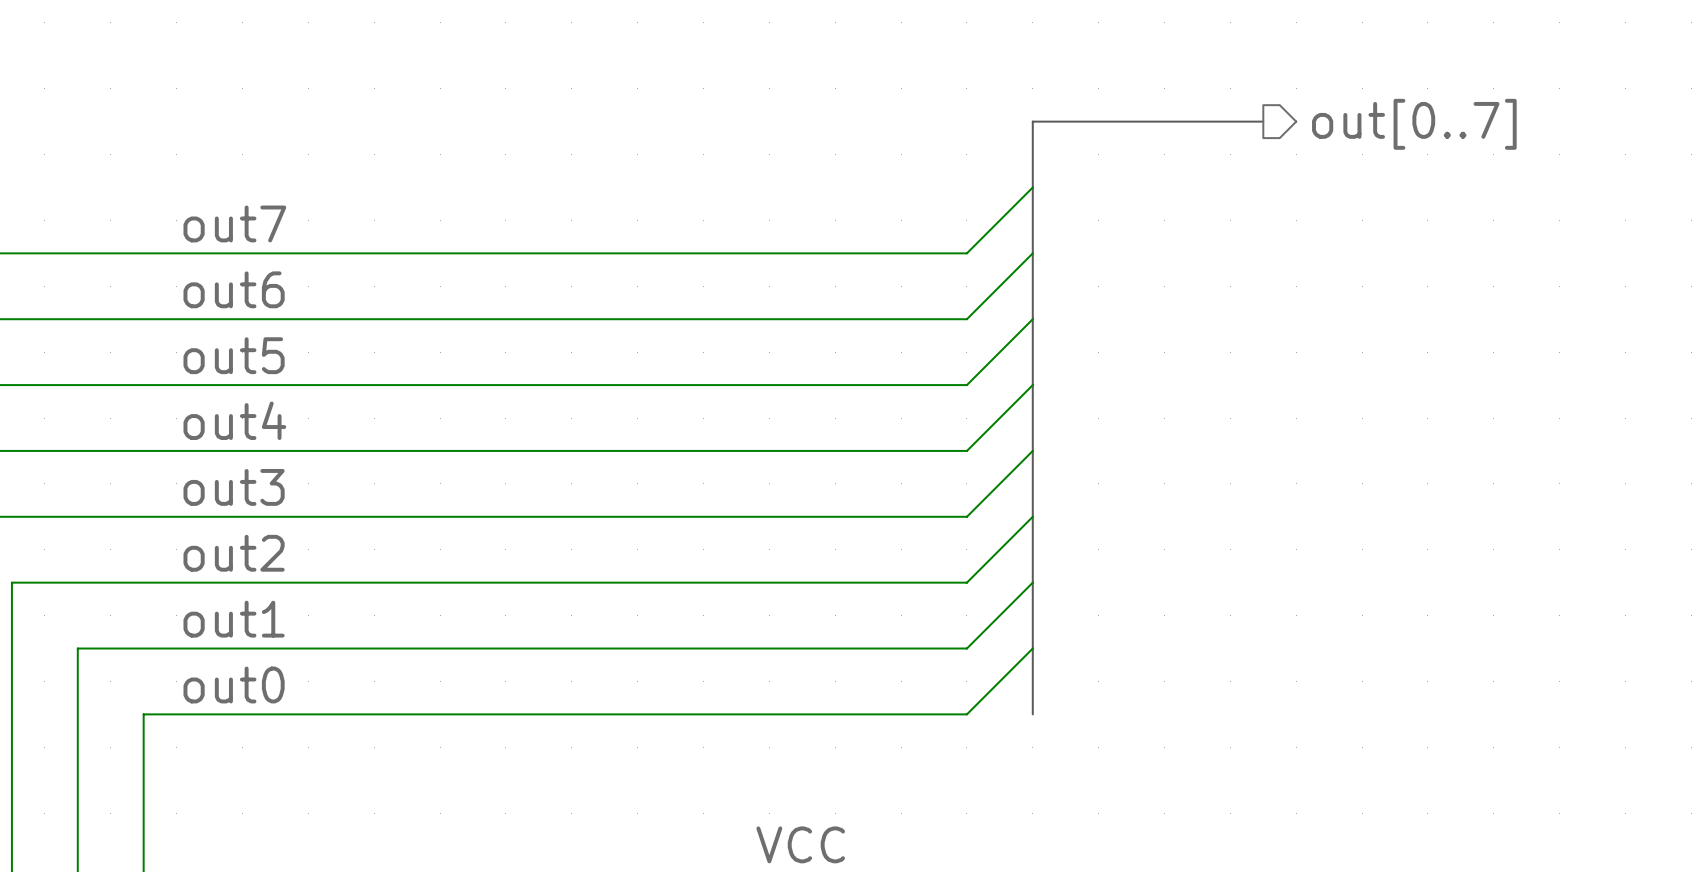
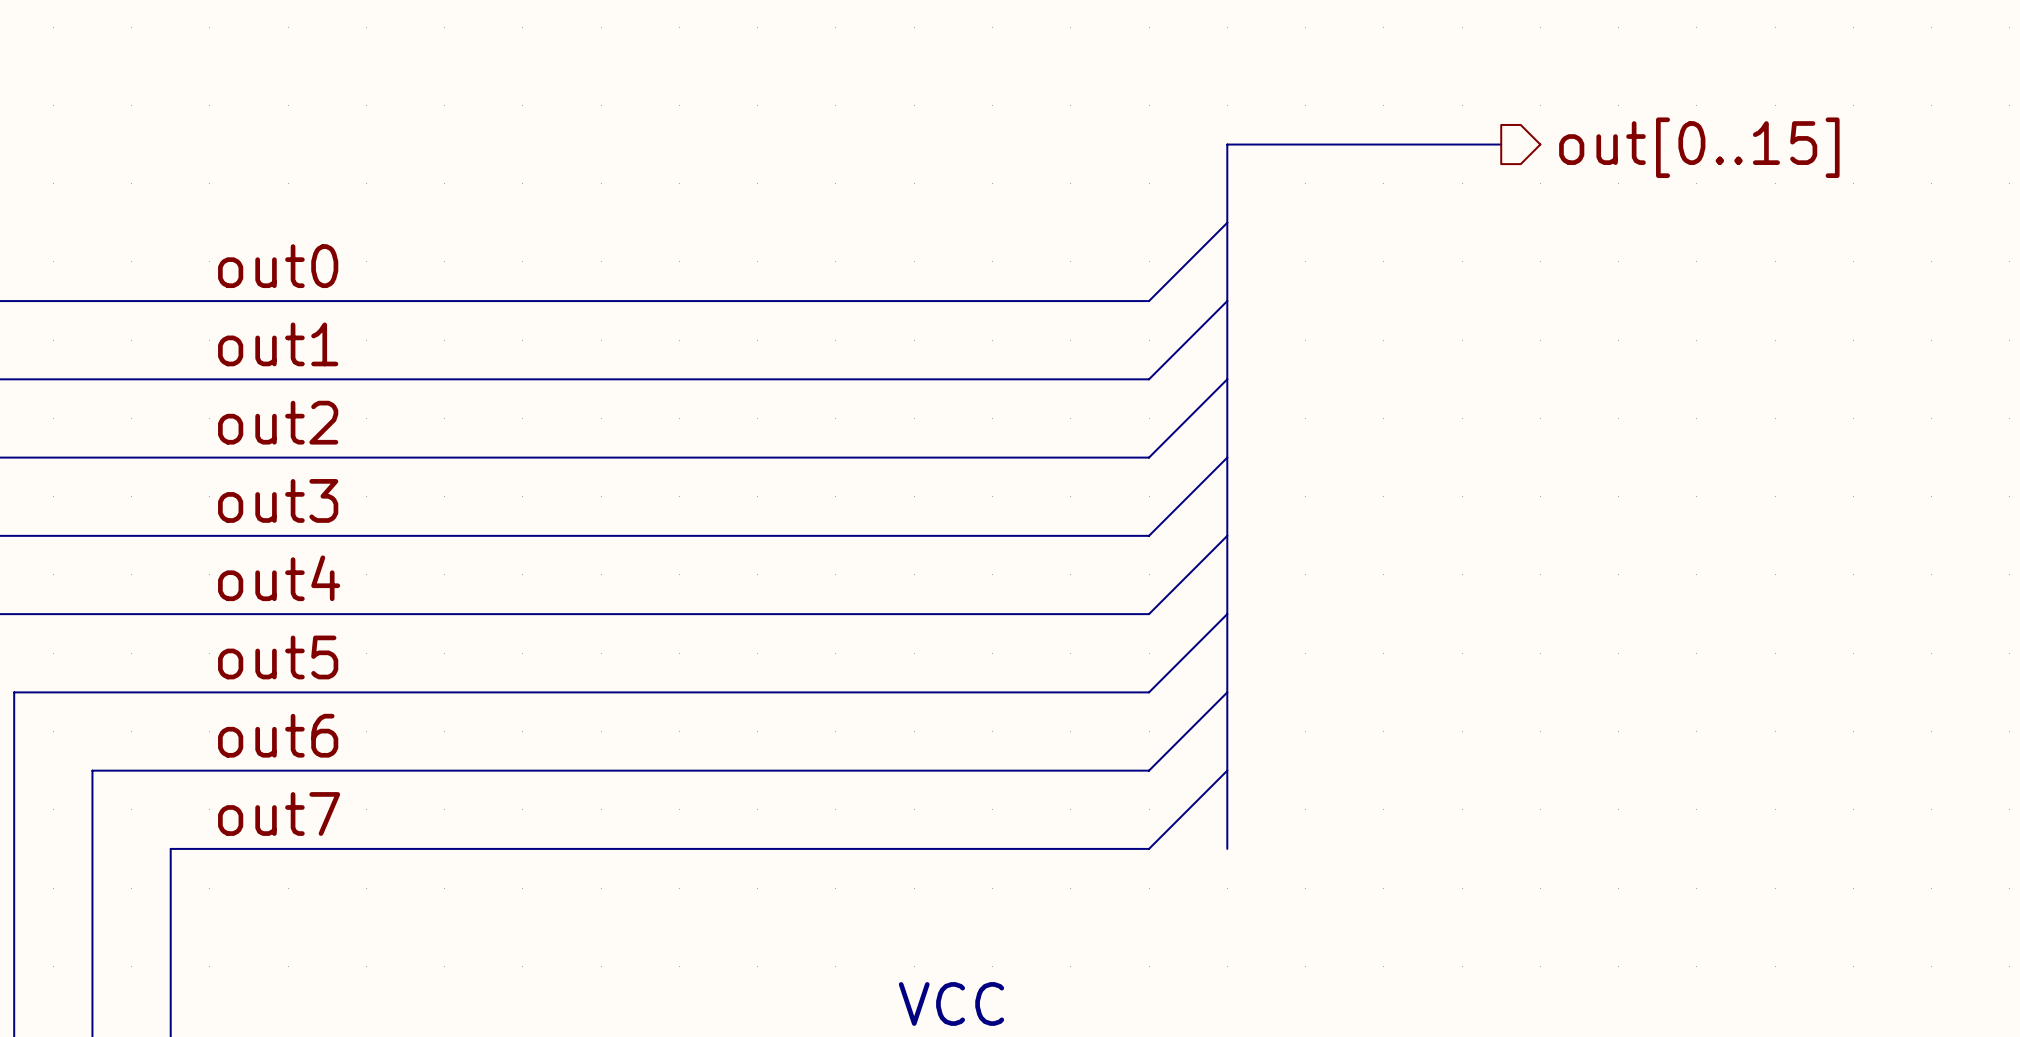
hierarchical label: out[0..7] (1414, 124) -> out[0..15] (1699, 147)
label: out7 (234, 223) -> out0 (278, 266)
label: out6 (234, 289) -> out1 (278, 344)
label: out5 (234, 355) -> out2 (278, 422)
label: out4 (234, 420) -> out3 (278, 500)
label: out3 (234, 487) -> out4 (279, 578)
label: out2 (234, 553) -> out5 (278, 657)
label: out1 (234, 619) -> out6 (278, 735)
label: out0 (234, 684) -> out7 (279, 814)

